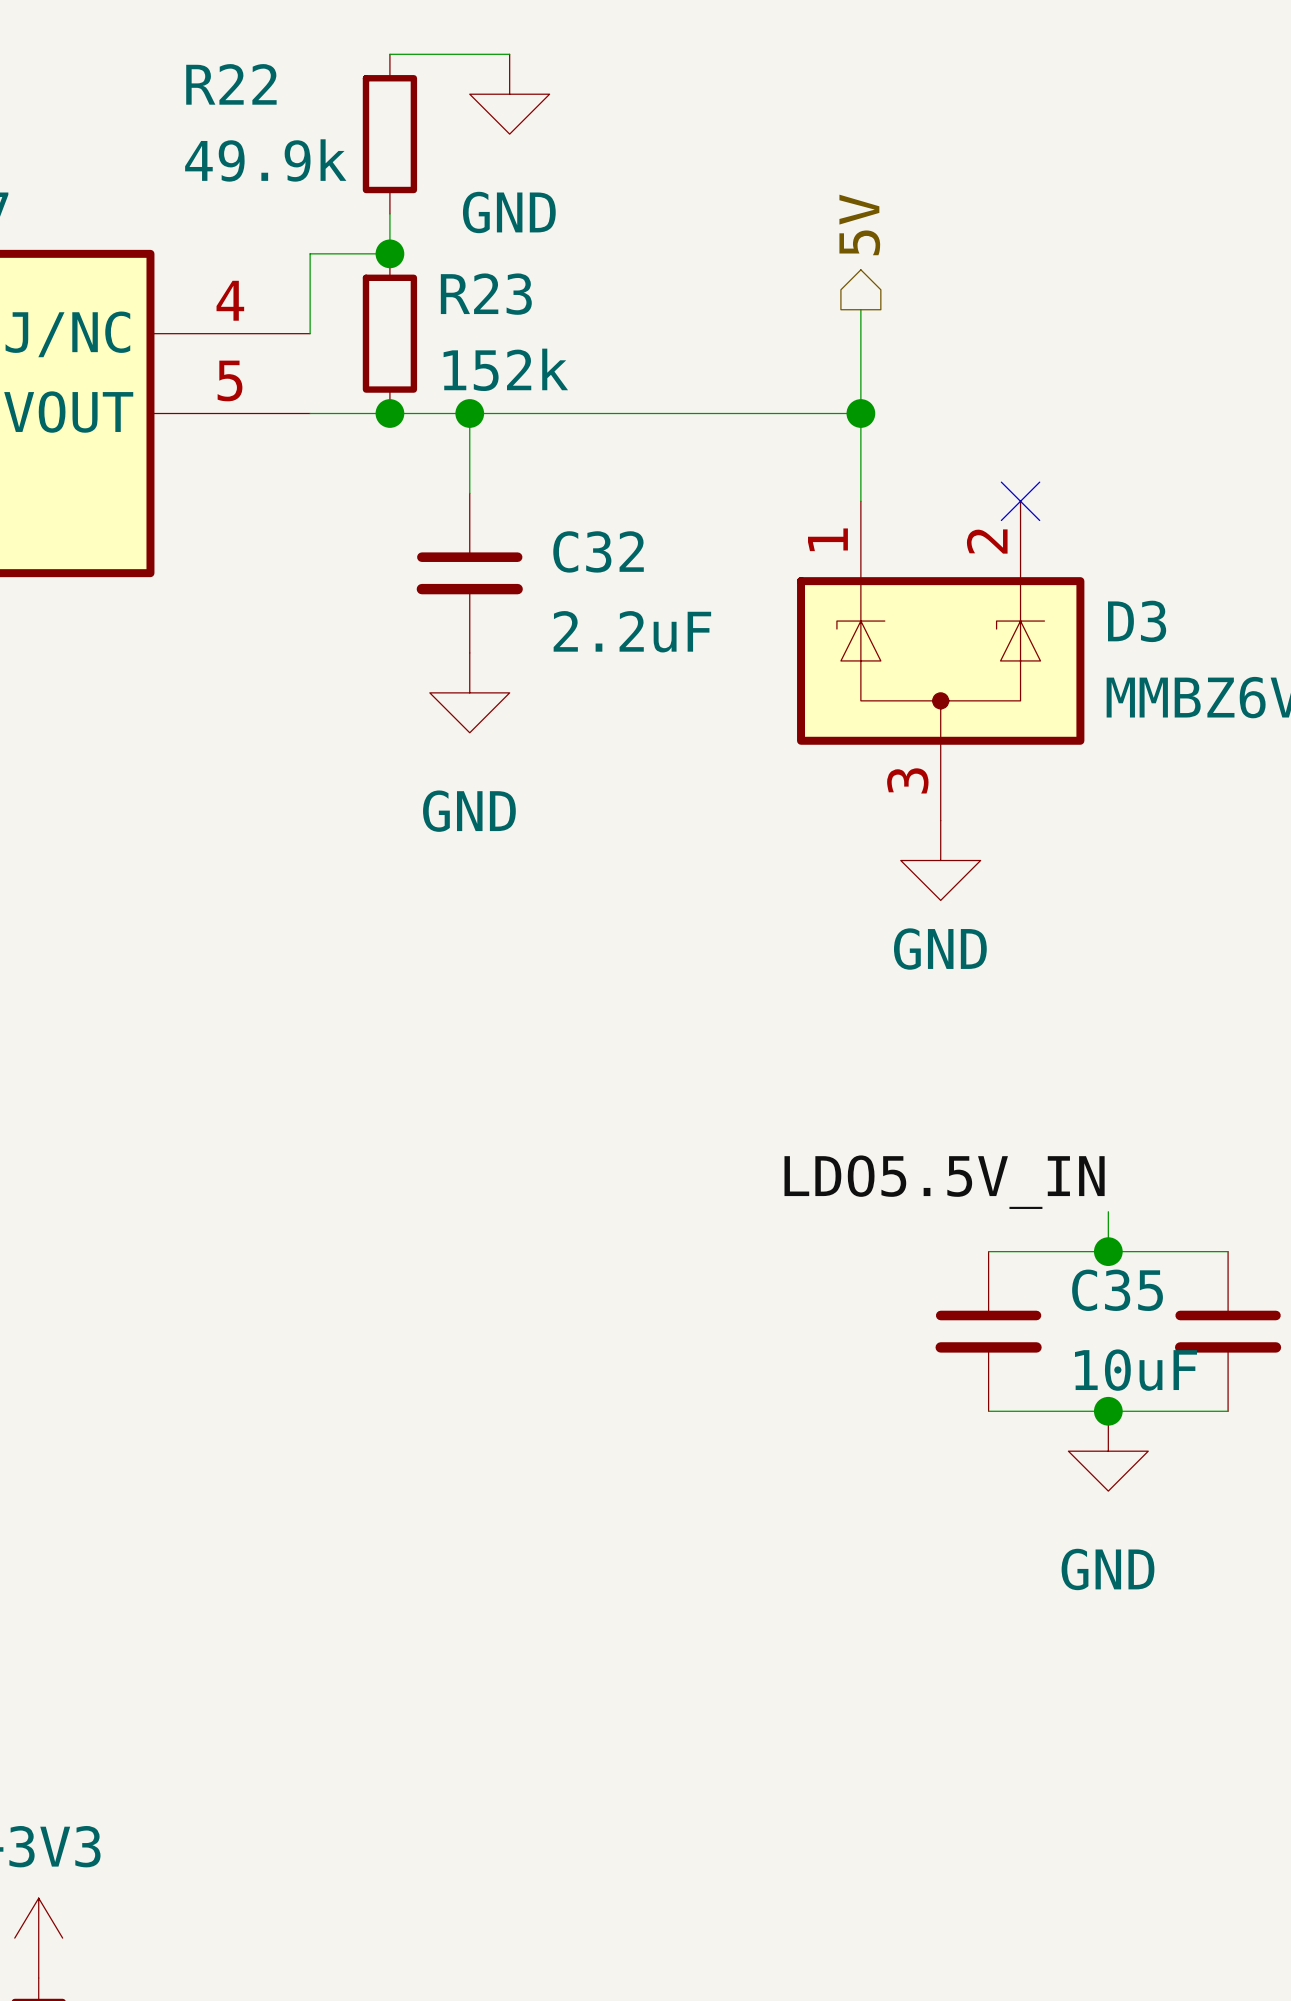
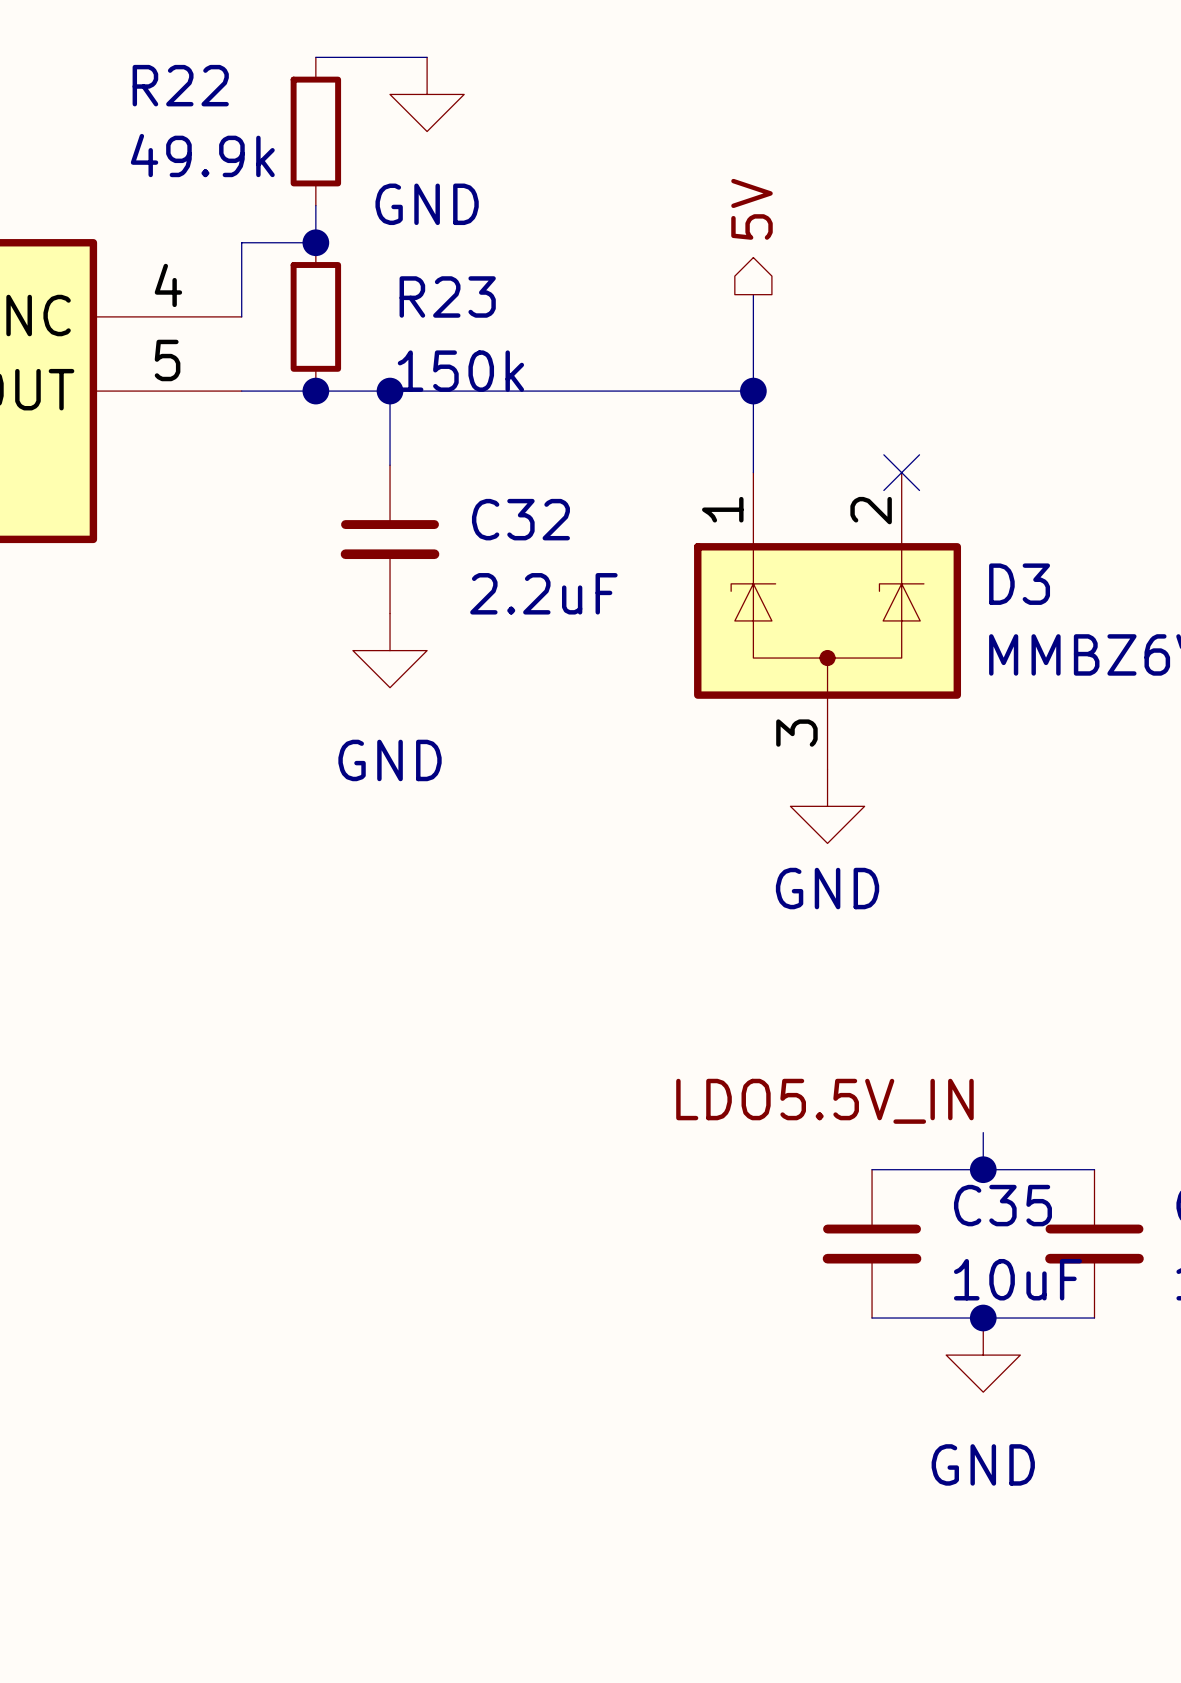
R23 name position: R23 (486, 294) -> R23 (447, 296)
R23 value: 152k (505, 369) -> 150k (460, 371)

